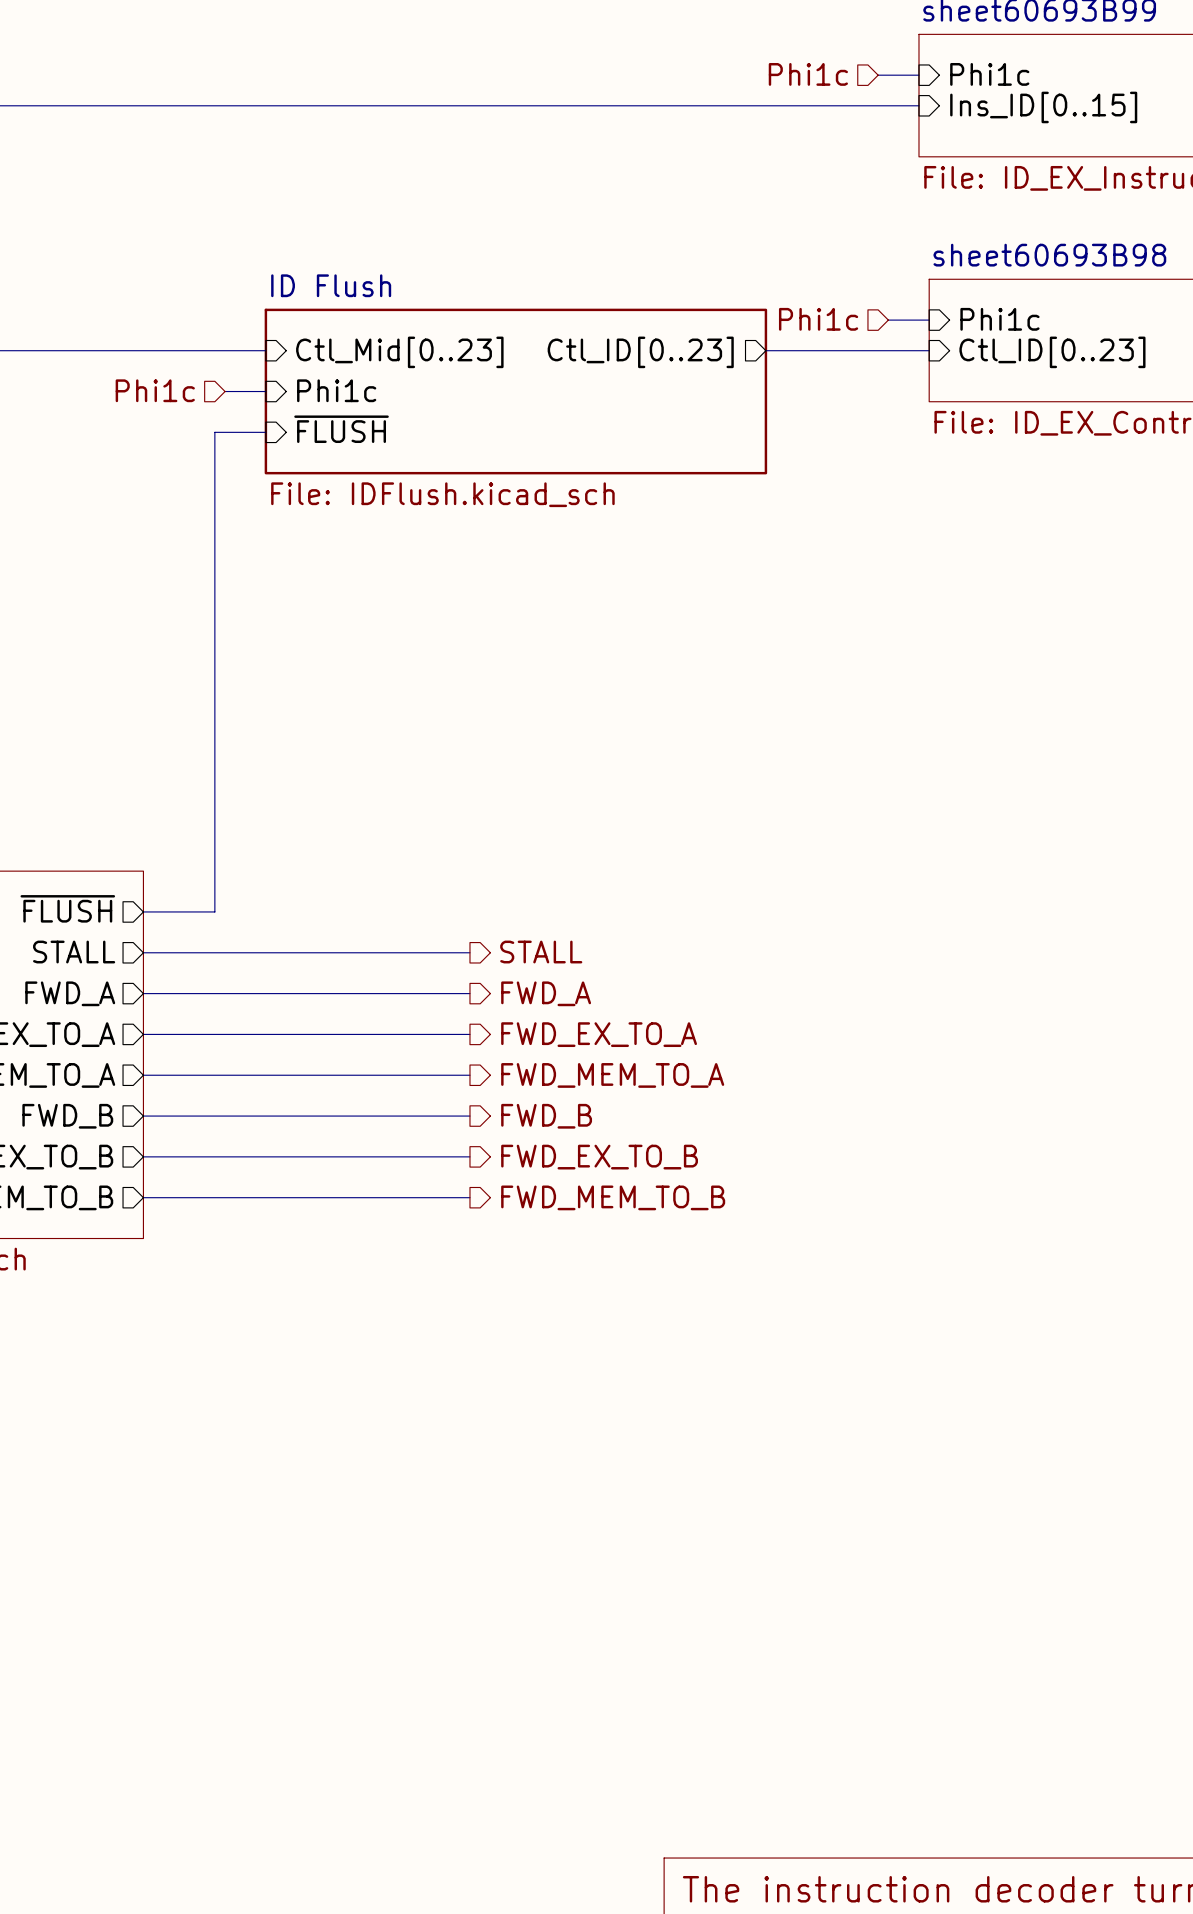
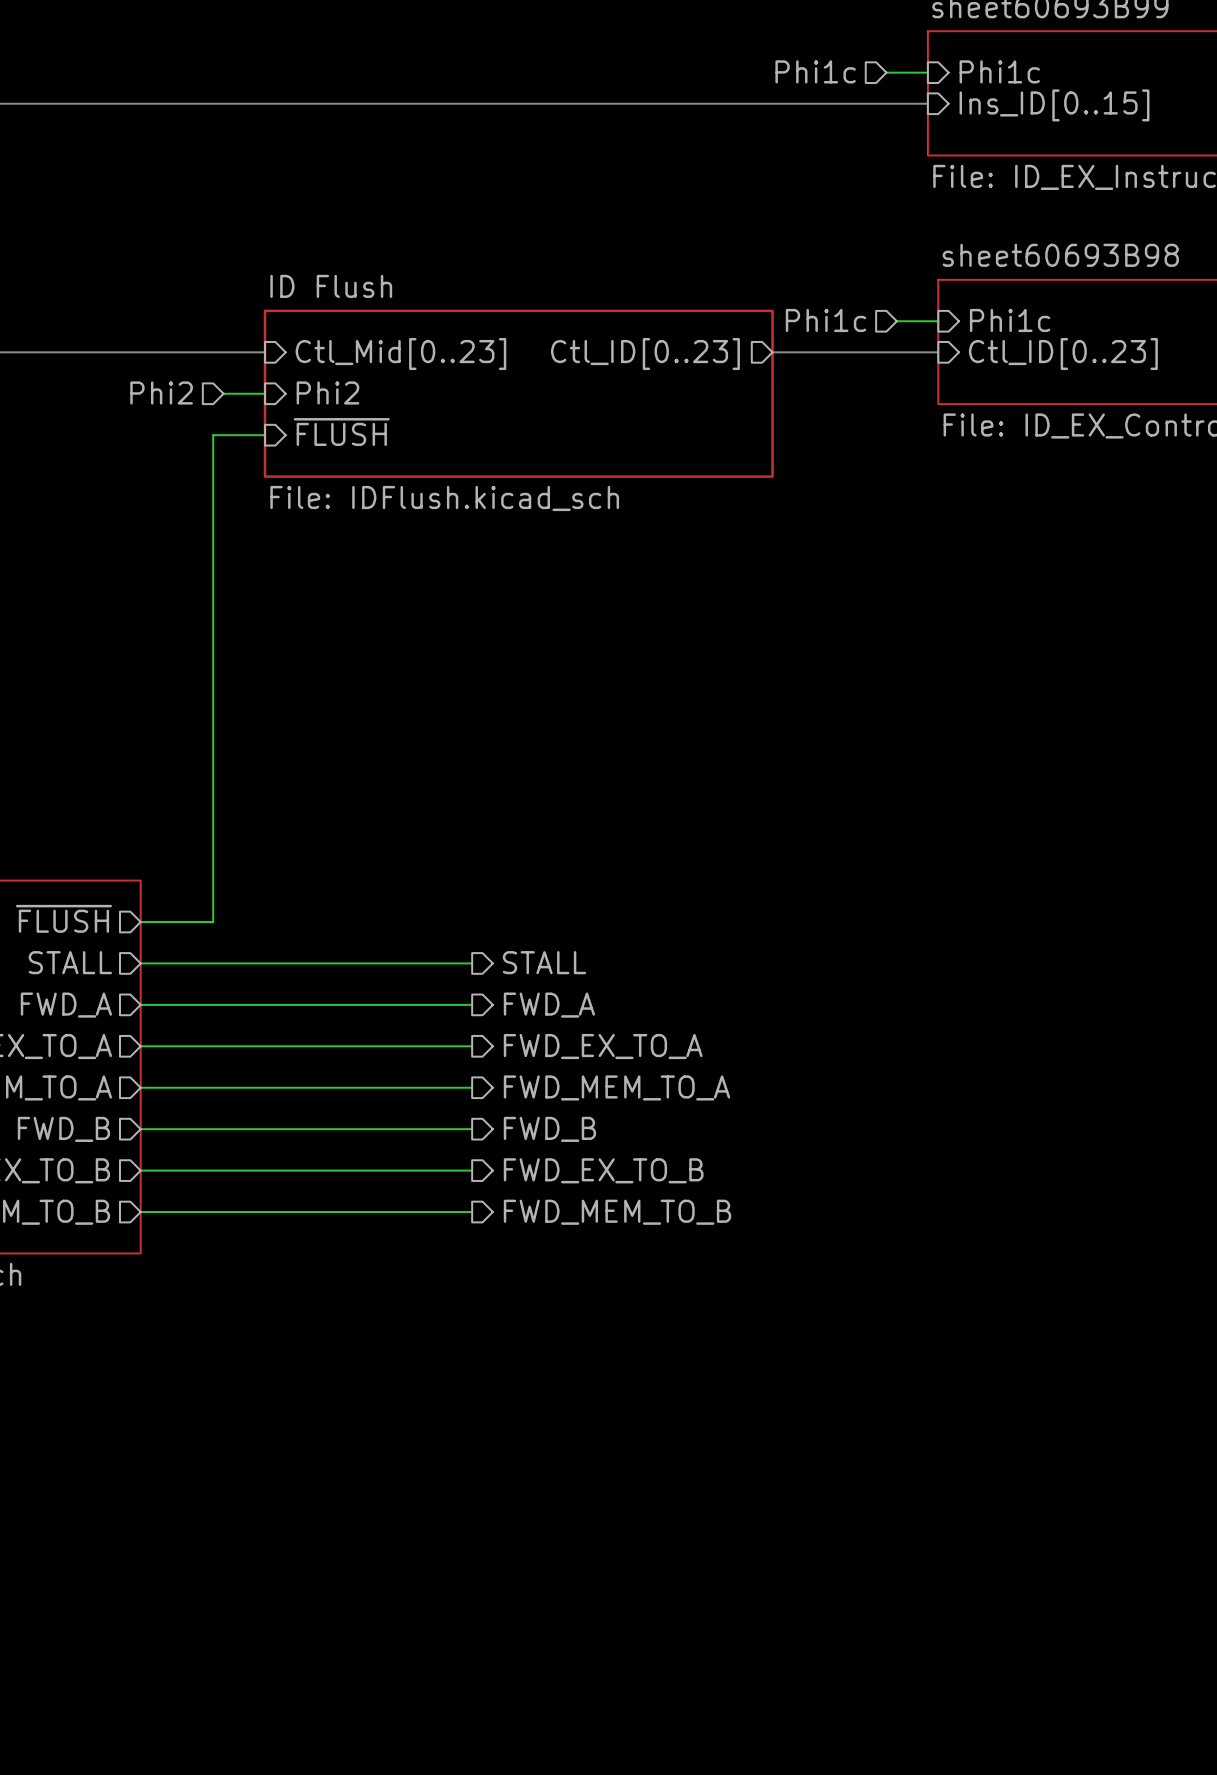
hierarchical label: Phi1c (155, 390) -> Phi2 (161, 392)
sheet pin: Phi1c (336, 390) -> Phi2 (327, 392)

